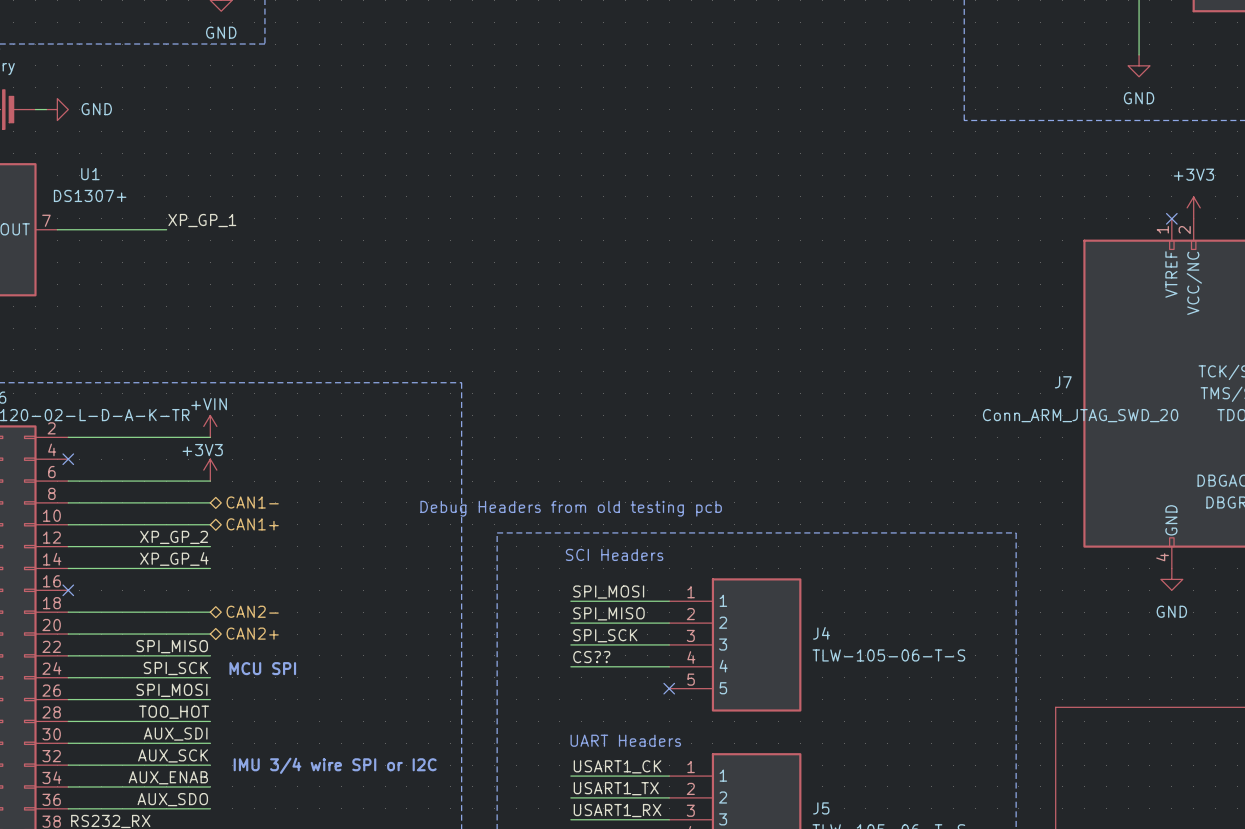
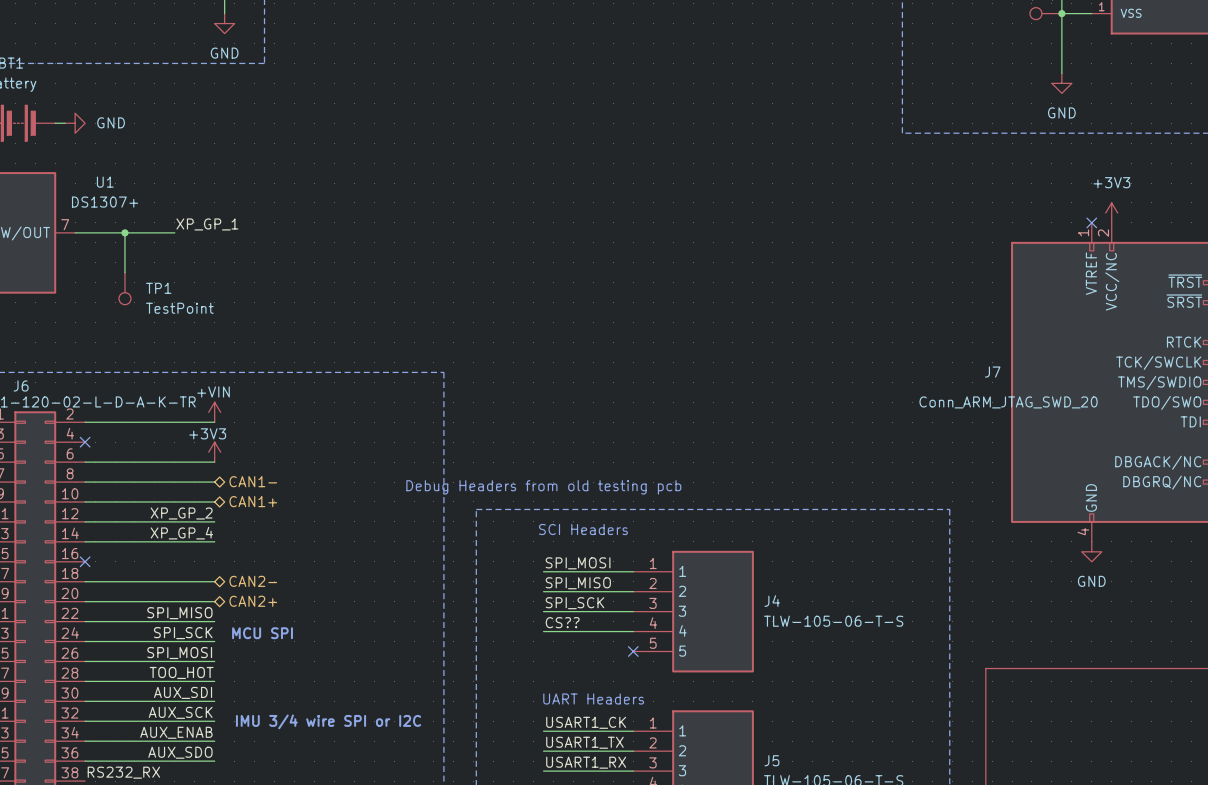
wire: none -> (124, 232) (124, 272)
junction: none -> (124, 232)
TP1: none -> TestPoint (124, 288)

